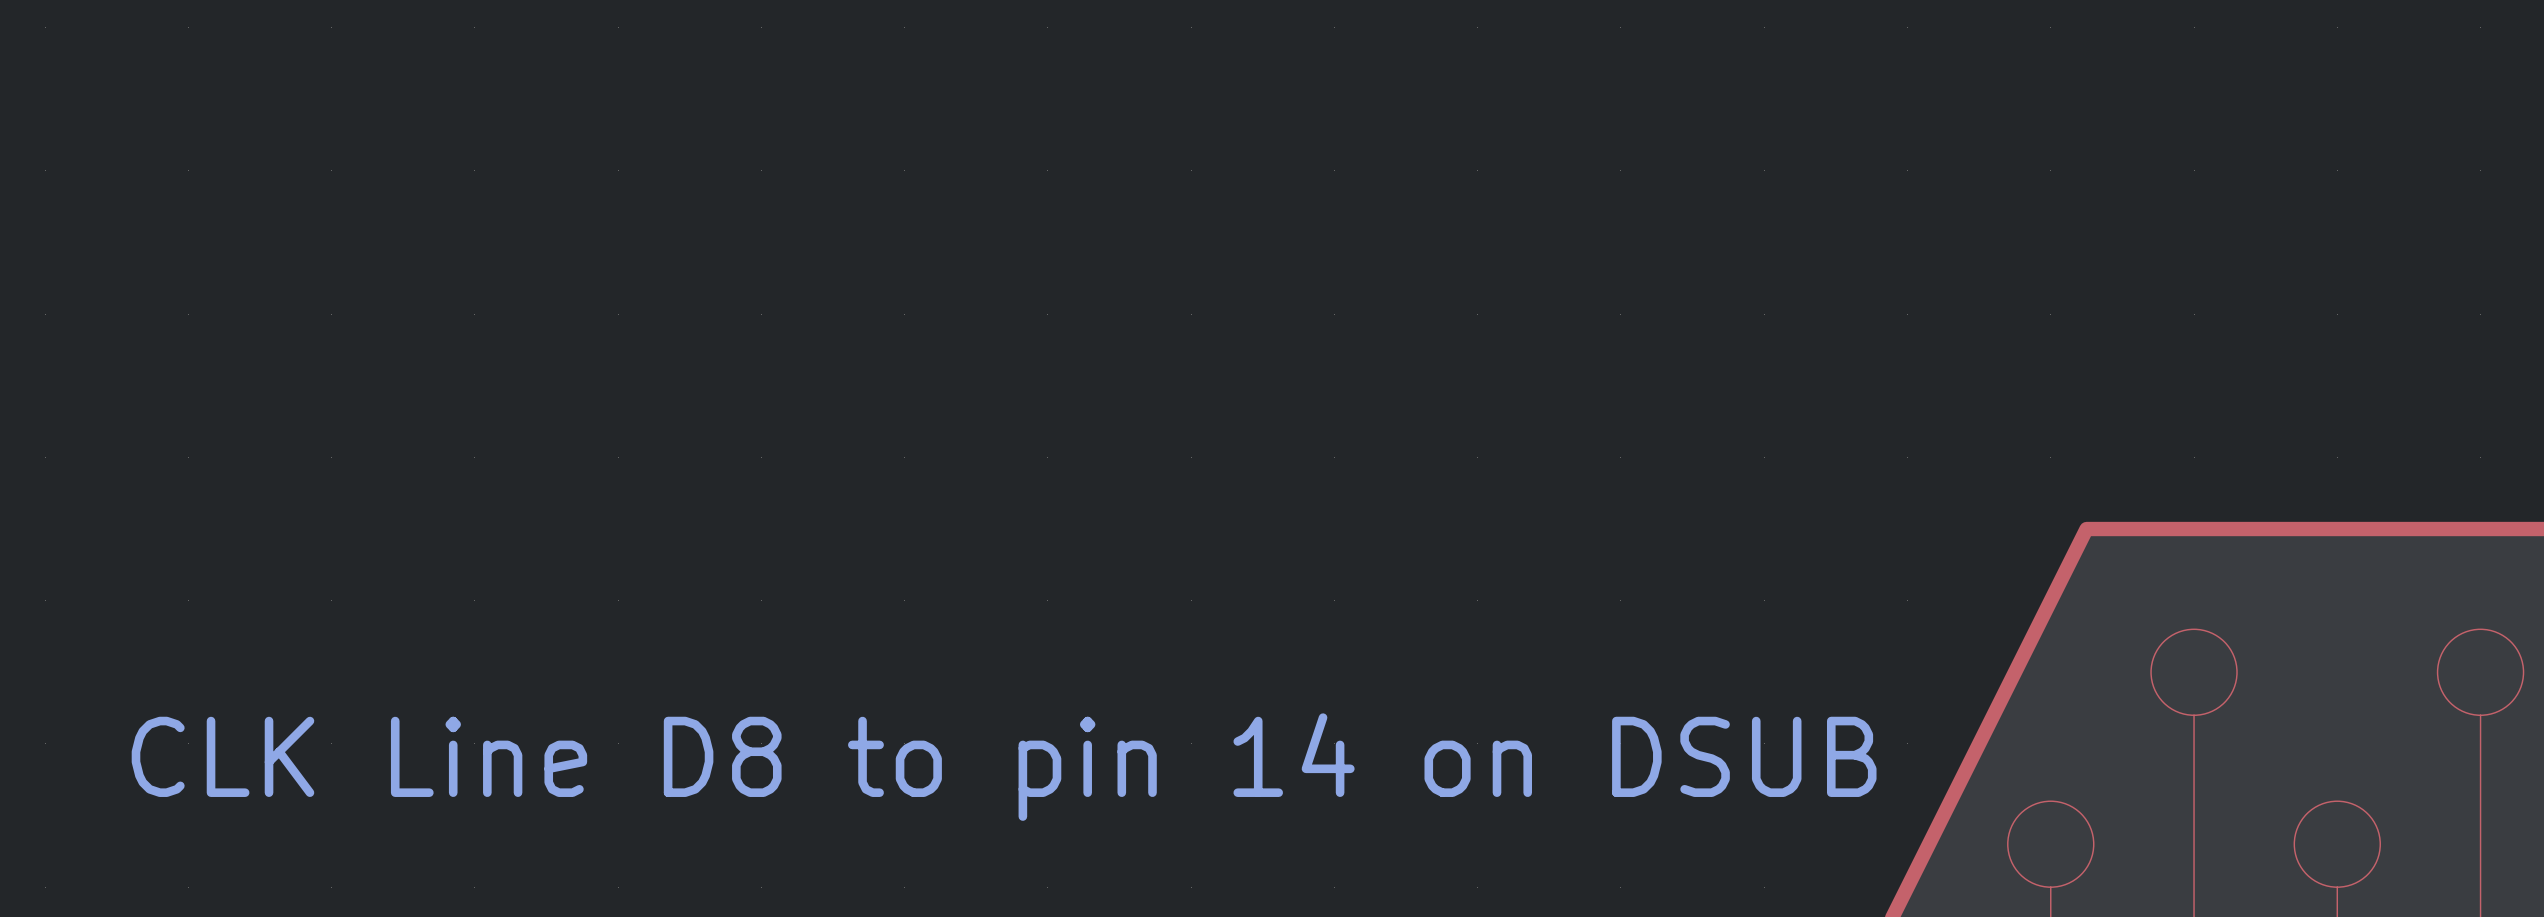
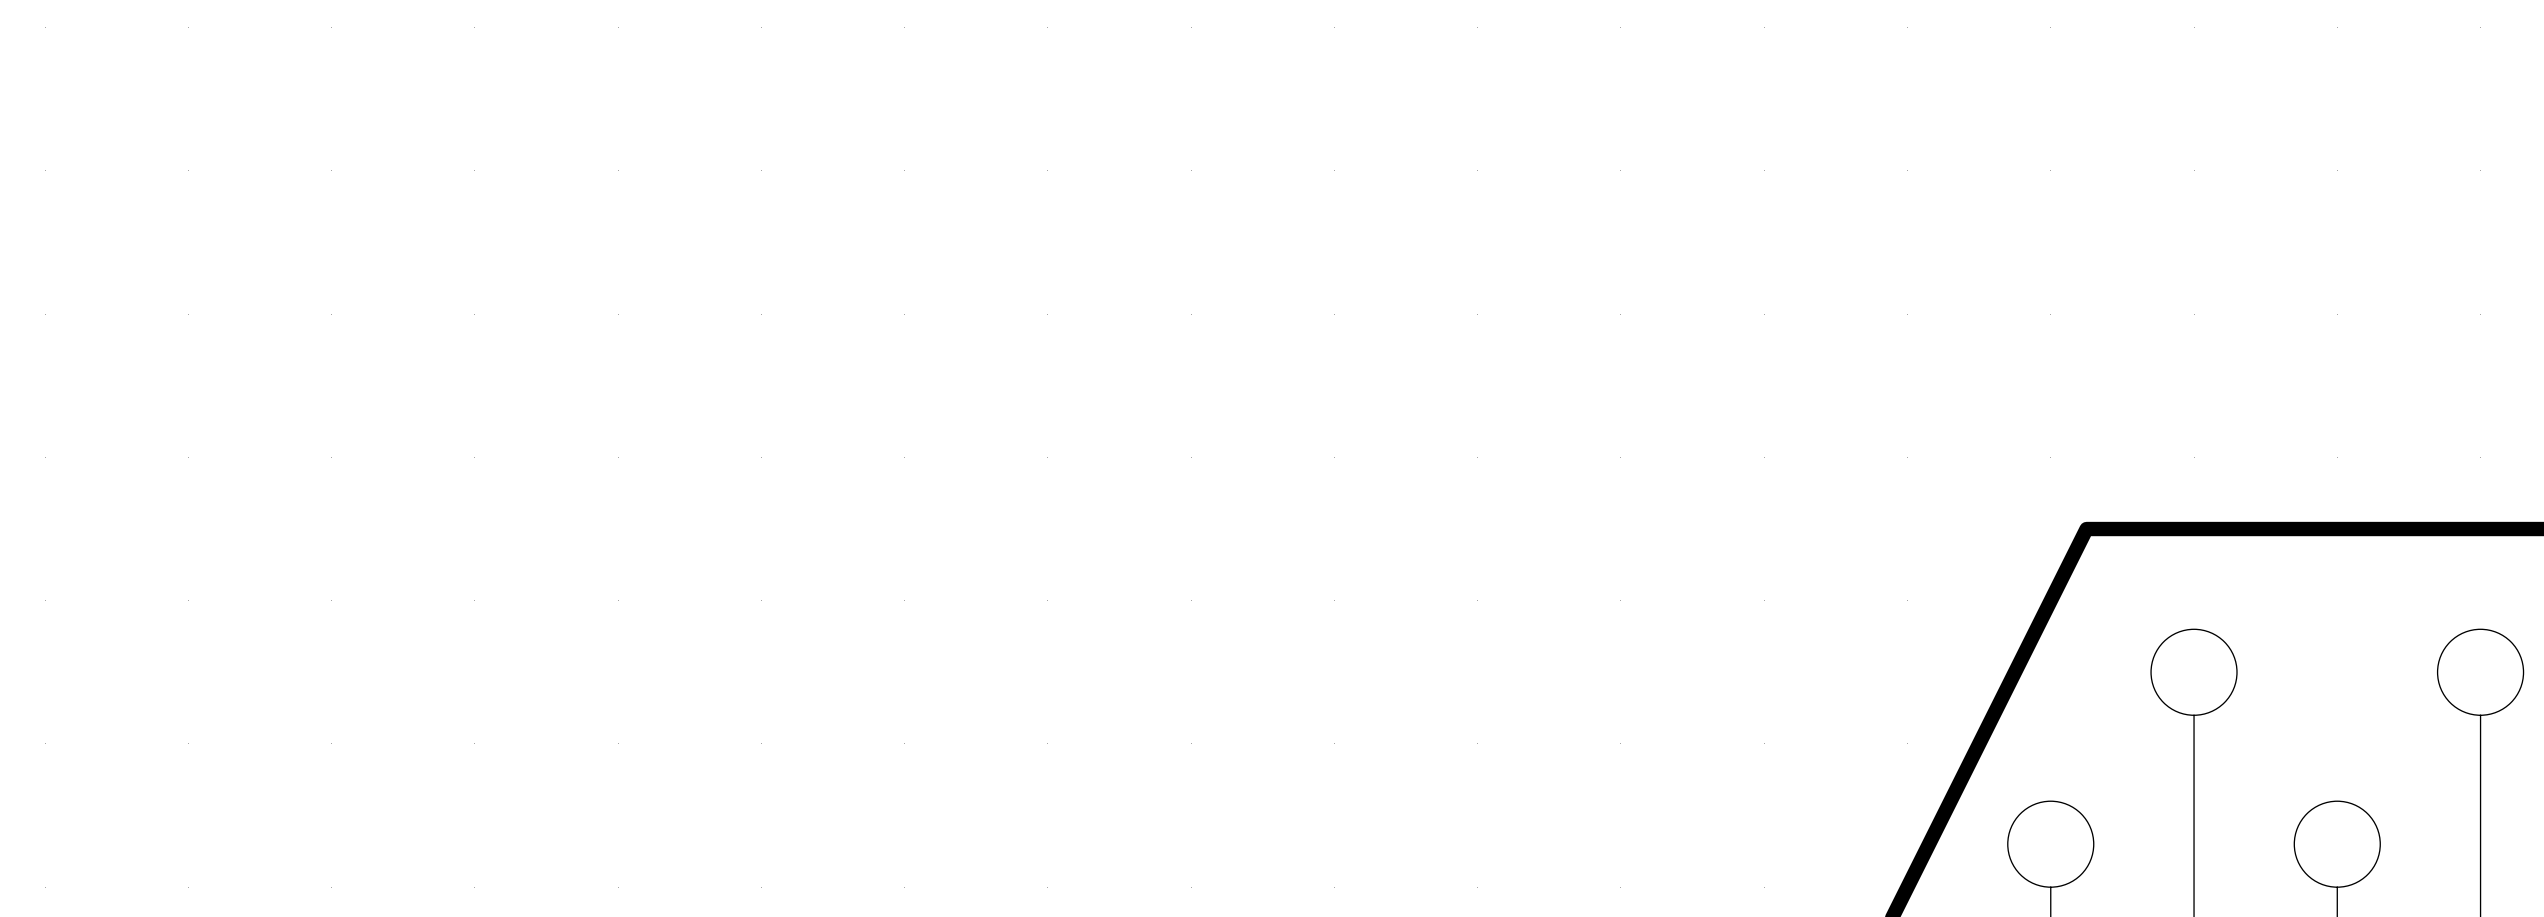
text: CLK Line D8 to pin 14 on DSUB (1004, 767) -> none

